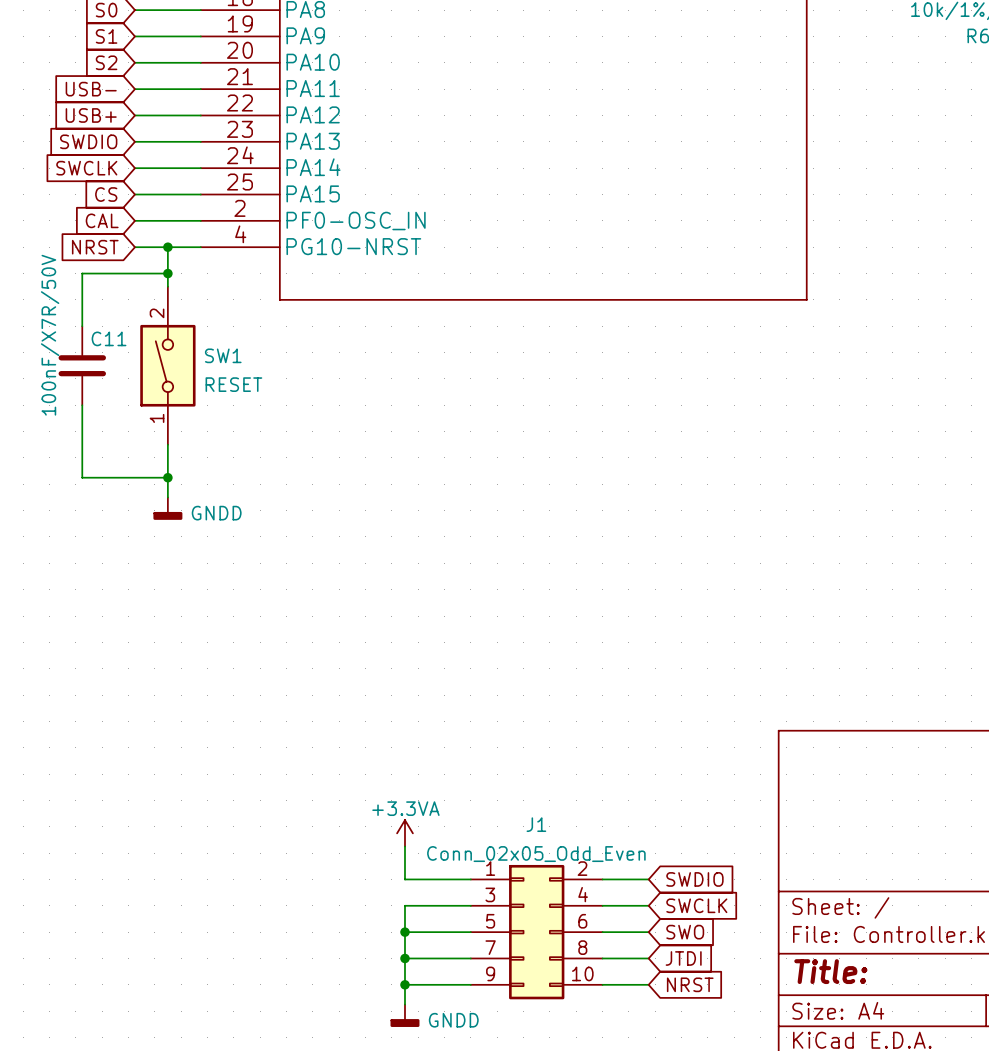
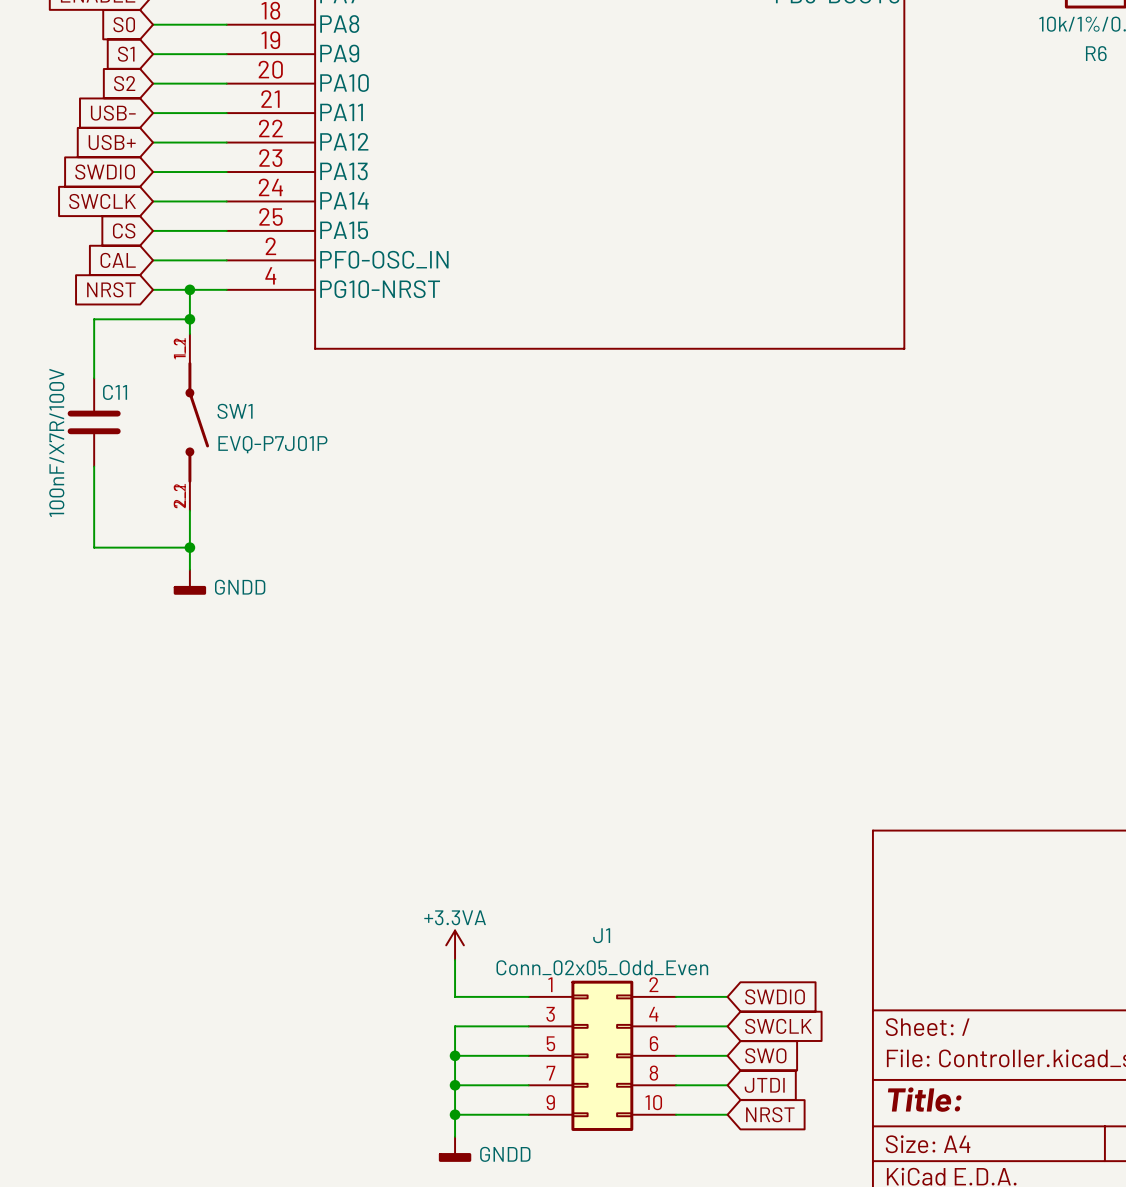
SW1 symbol: [140, 286, 196, 445] -> [185, 334, 210, 511]
C11 value: 100nF/X7R/50V (50, 335) -> 100nF/X7R/100V (56, 442)
SW1 value: RESET (233, 384) -> EVQ-P7J01P (272, 444)

